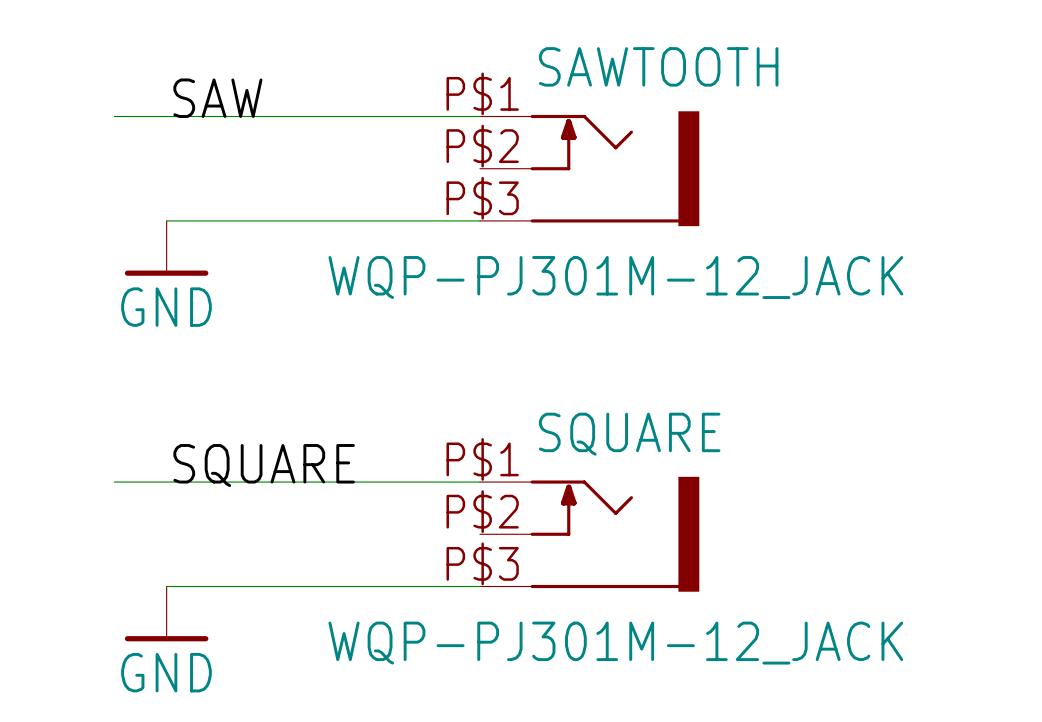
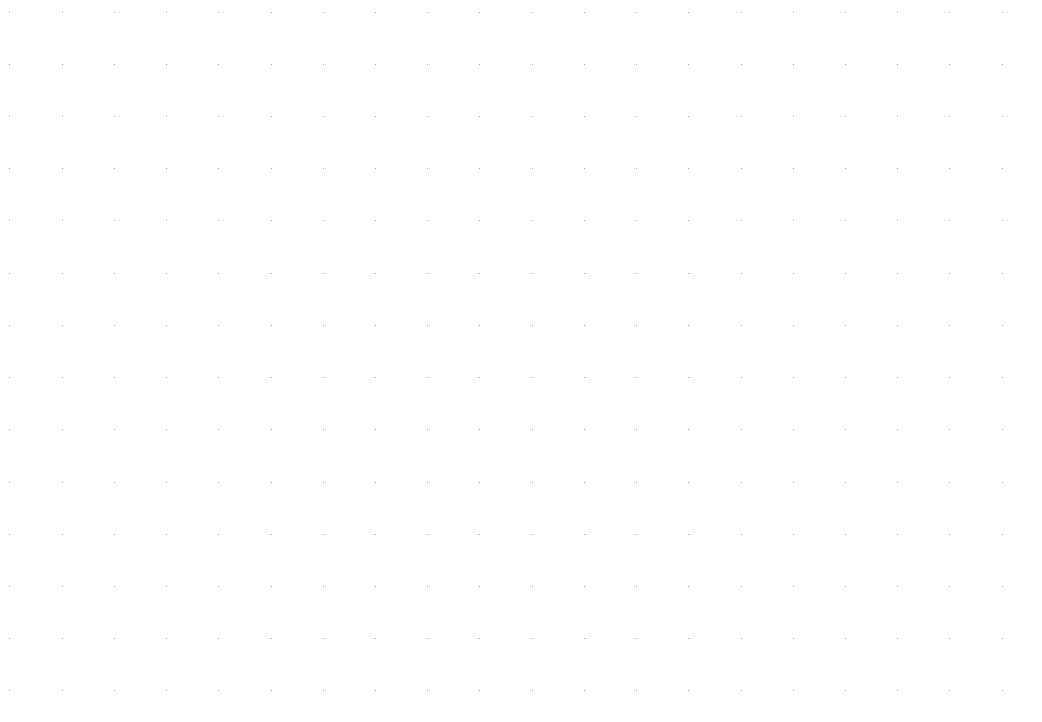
label: SAW (217, 98) -> none
wire: (114, 116) (479, 116) -> none
SAWTOOTH: WQP-PJ301M-12_JACK (589, 168) -> none
wire: (166, 220) (479, 220) -> none
power symbol: GND (166, 248) -> none
label: SQUARE (264, 465) -> none
wire: (114, 482) (479, 482) -> none
SQUARE: WQP-PJ301M-12_JACK (589, 534) -> none
wire: (166, 586) (479, 586) -> none
power symbol: GND (166, 613) -> none

